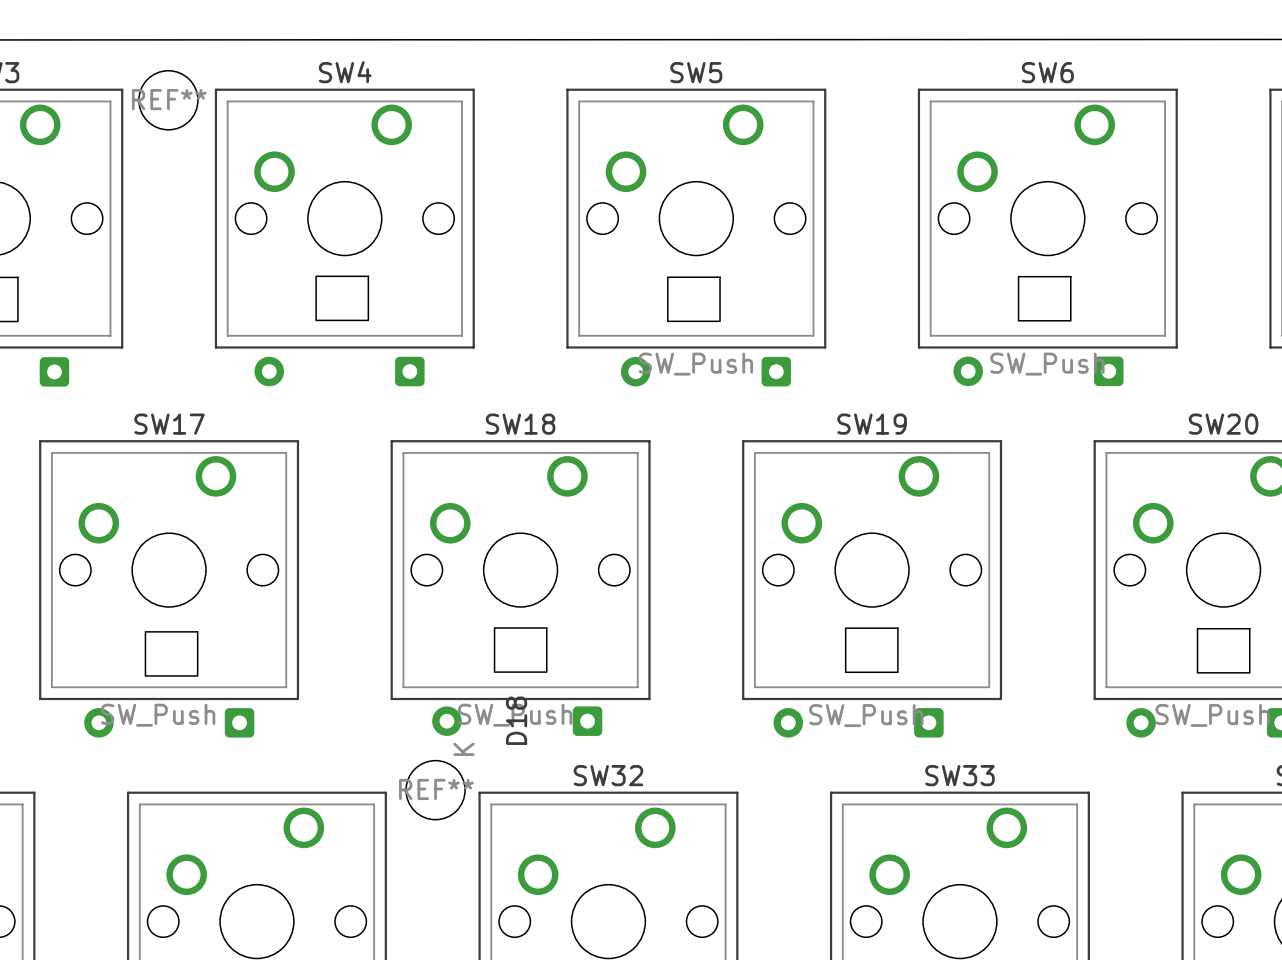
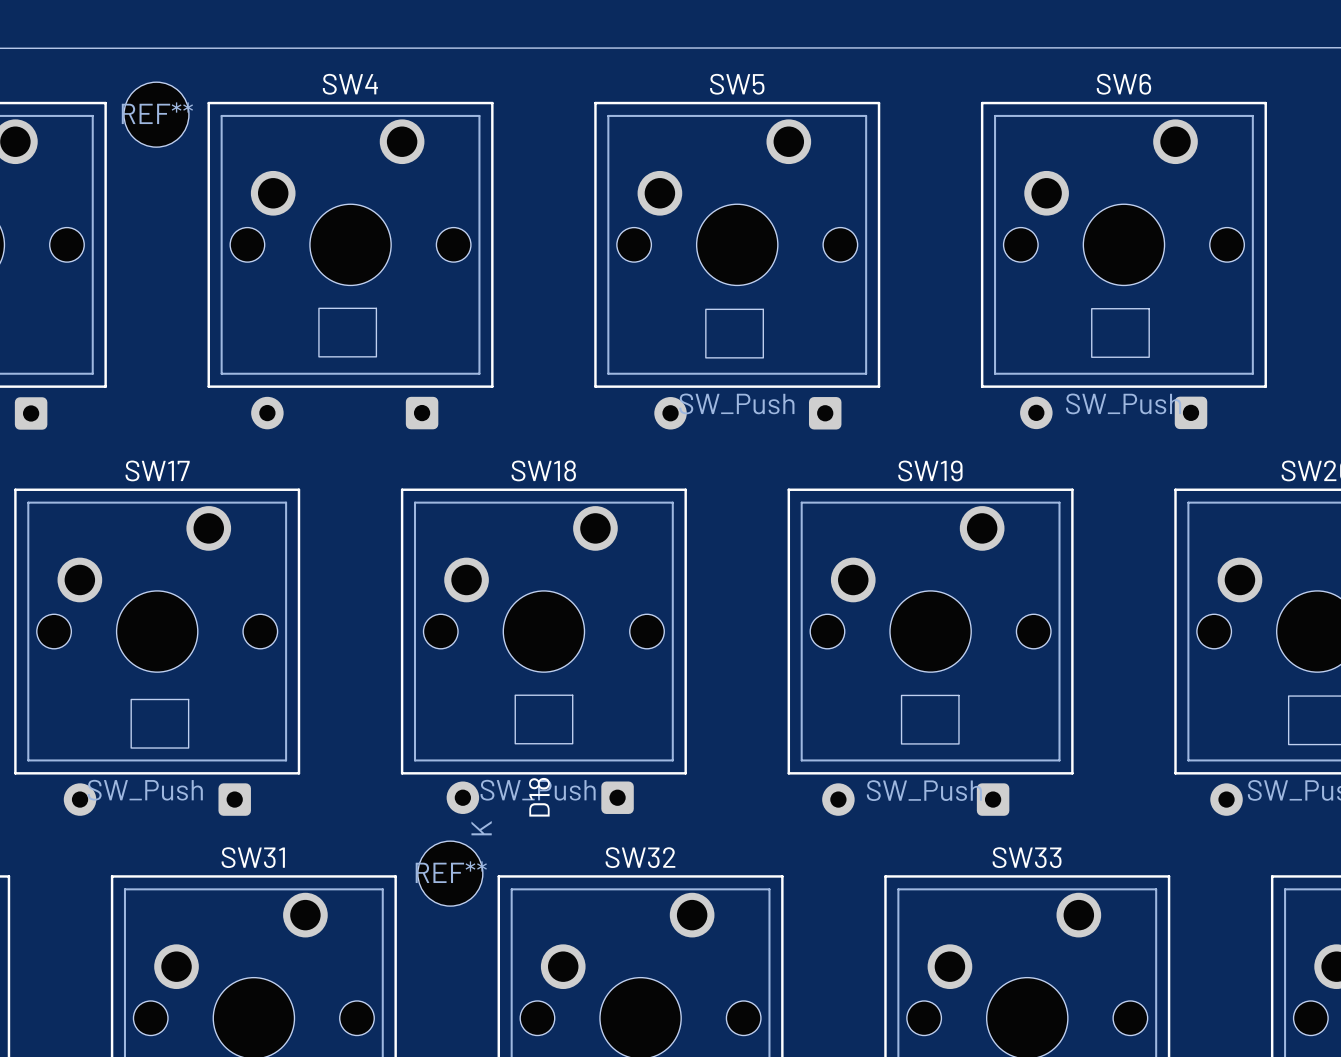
SW31 name: none -> SW31 (253, 857)

